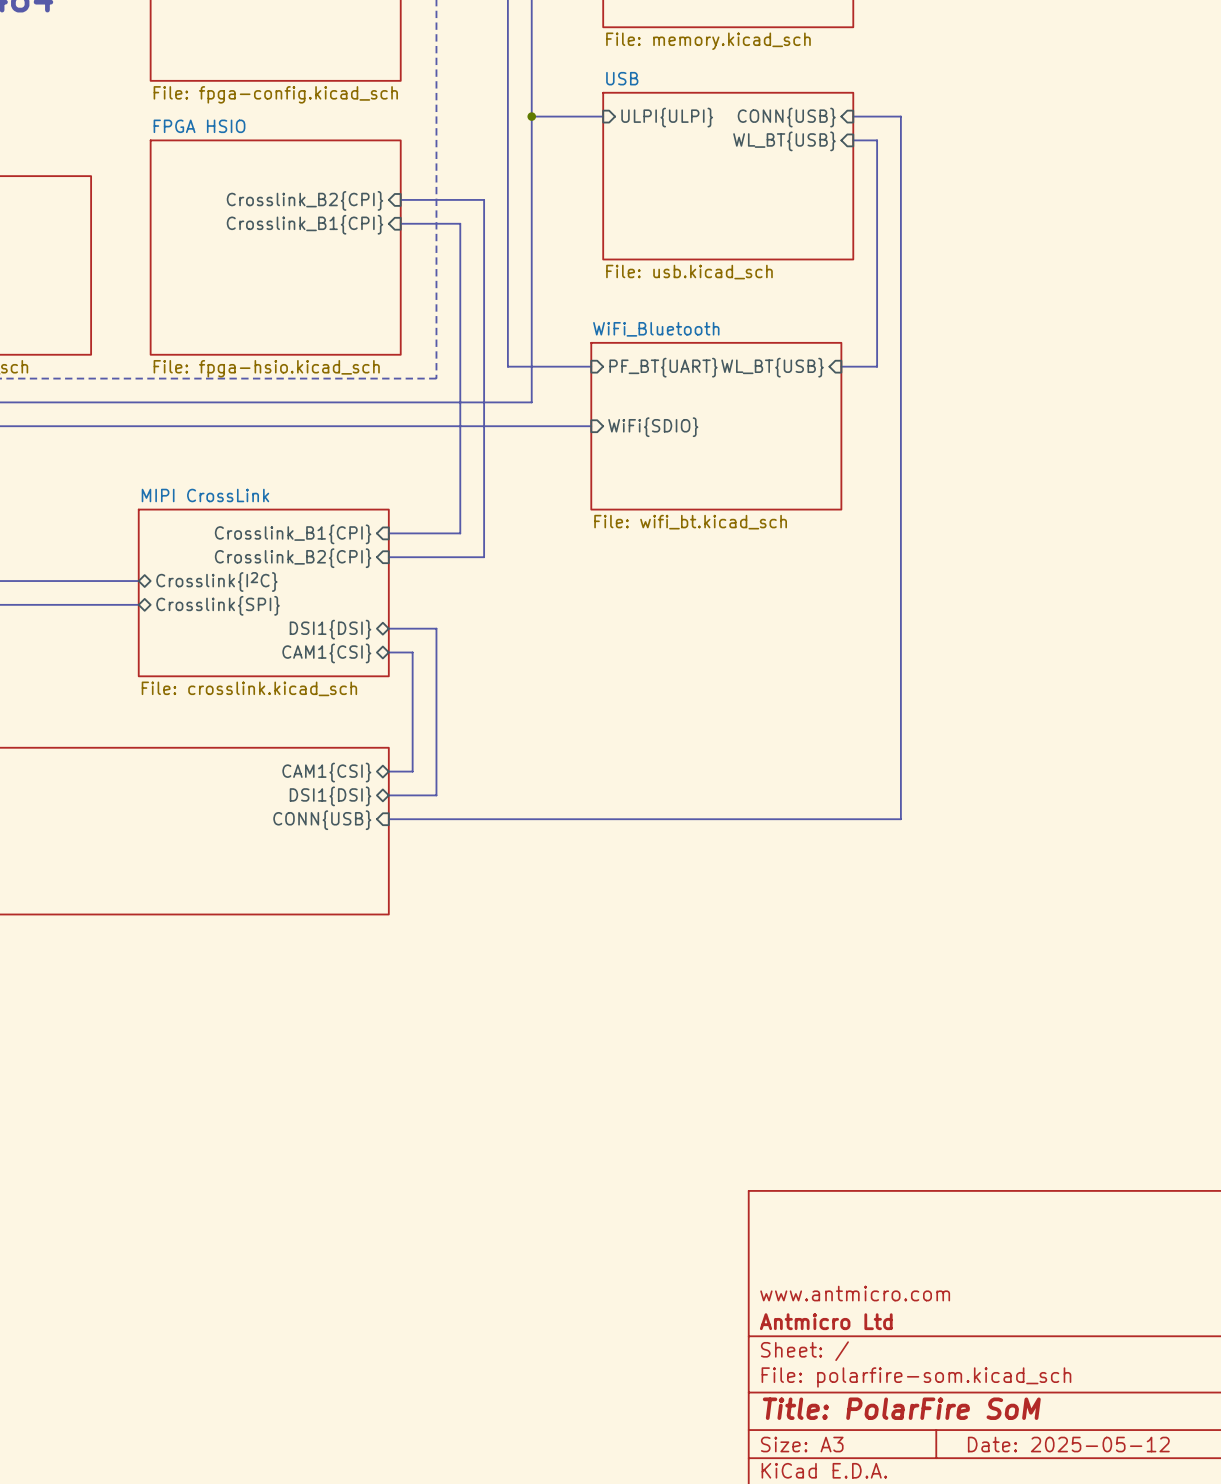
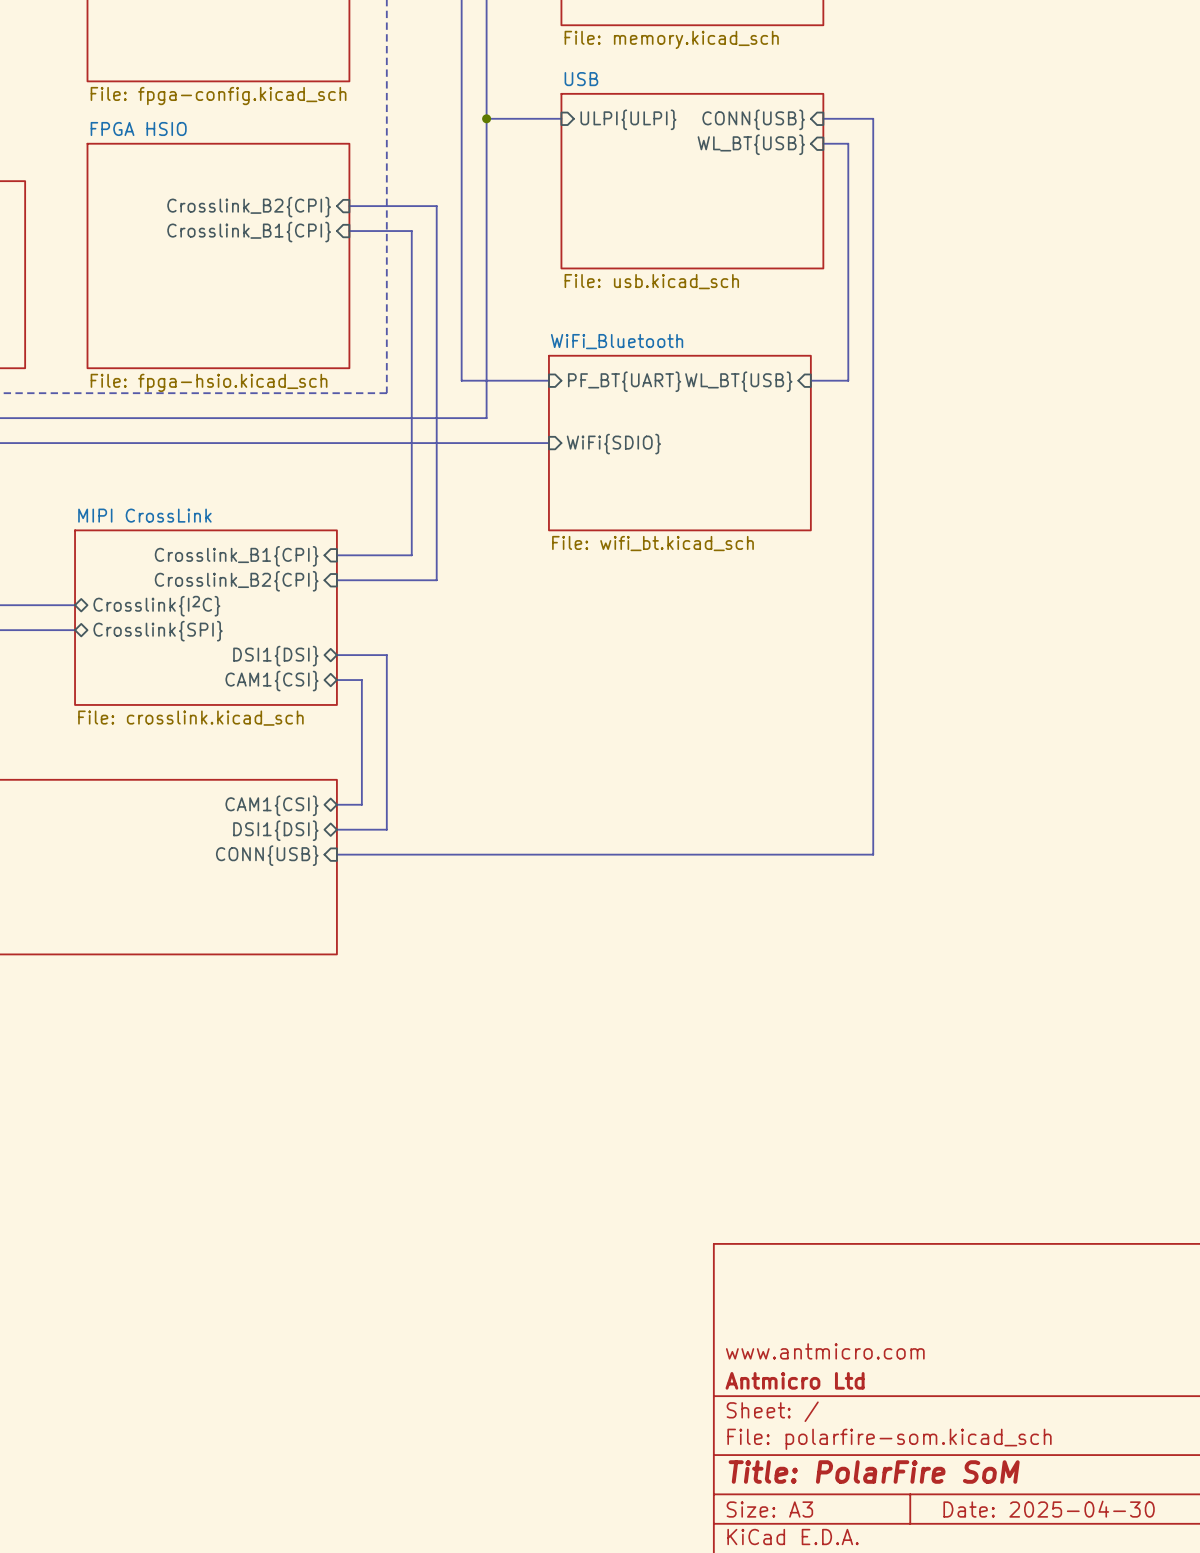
title block: Date: 2025-05-12 (1068, 1444) -> Date: 2025-04-30 (1049, 1509)

